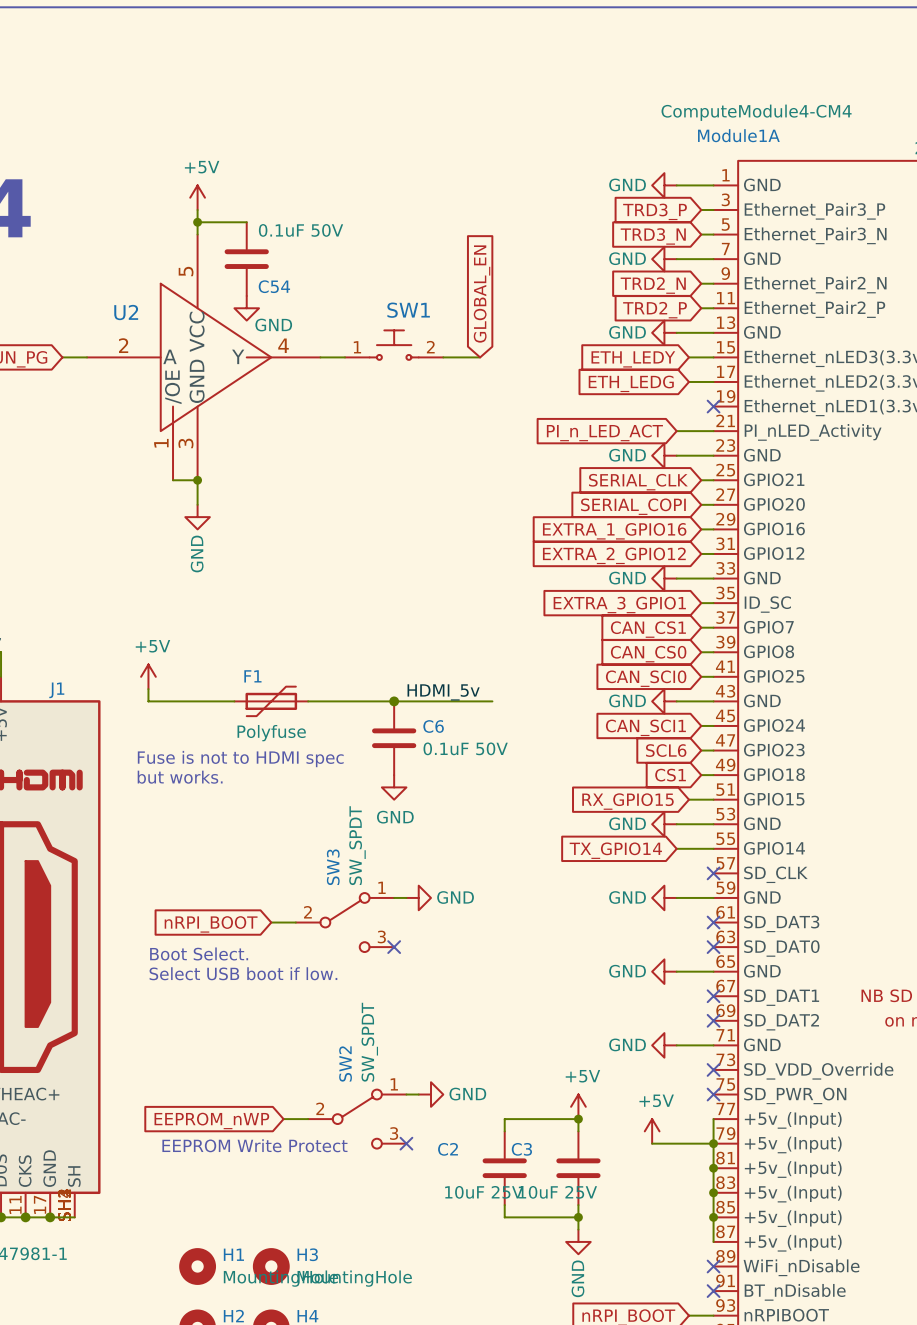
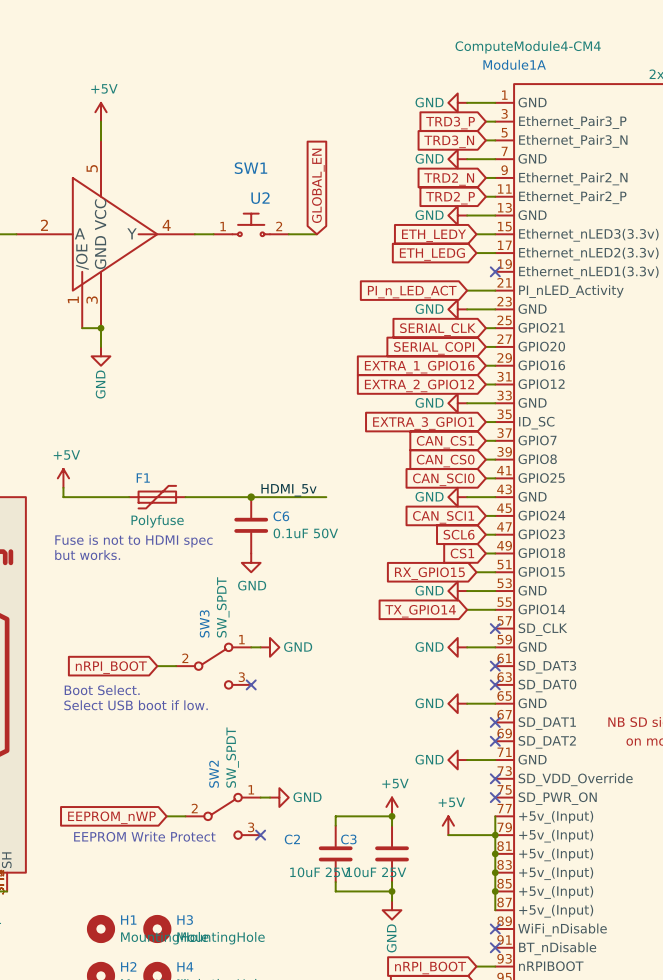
wire: (197, 222) (246, 222) -> none
junction: (197, 222) -> none
C54: 0.1uF 50V (246, 259) -> none
power symbol: GND (246, 308) -> none
SW1 name position: SW1 (408, 310) -> SW1 (251, 168)
U2 name position: U2 (126, 312) -> U2 (260, 198)

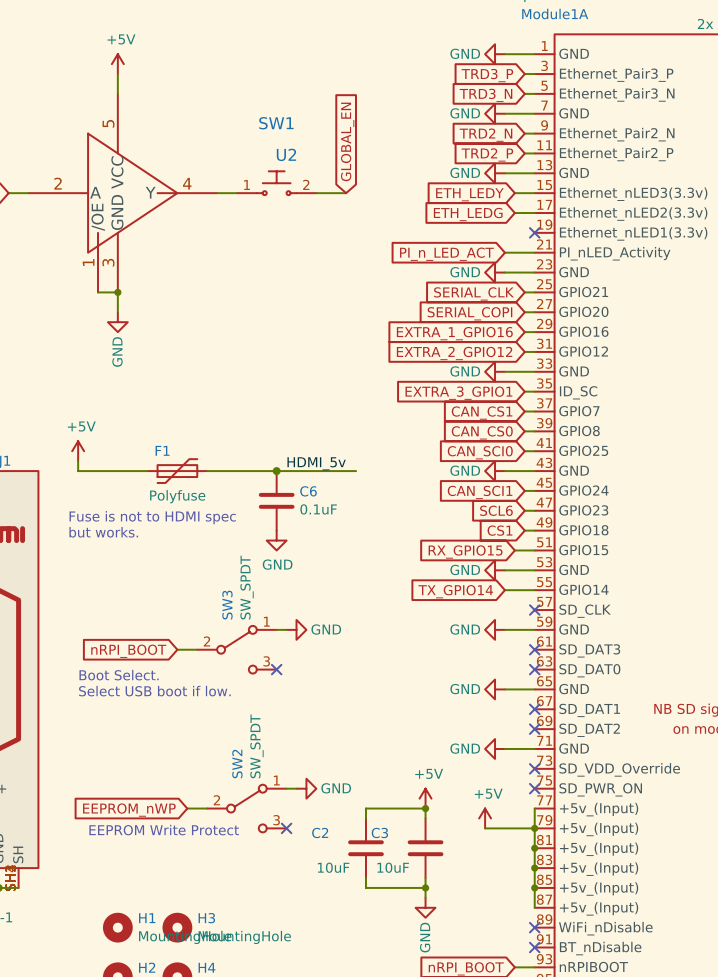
C6 value: 0.1uF 50V (305, 533) -> 0.1uF (318, 509)
C2 value: 10uF 25V (320, 872) -> 10uF (333, 867)
C3 value: 10uF 25V (376, 872) -> 10uF (393, 867)

